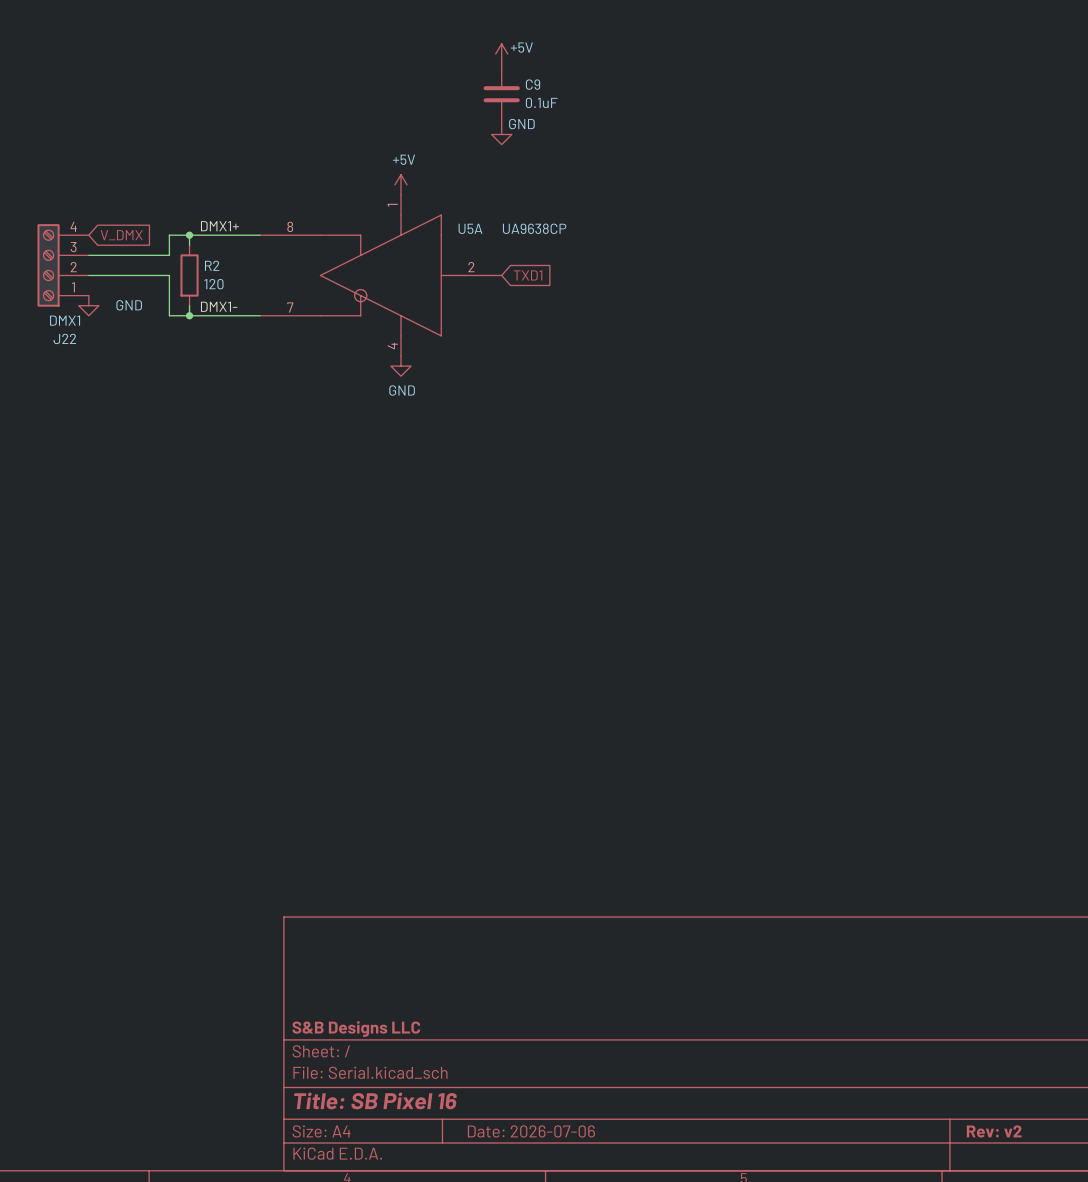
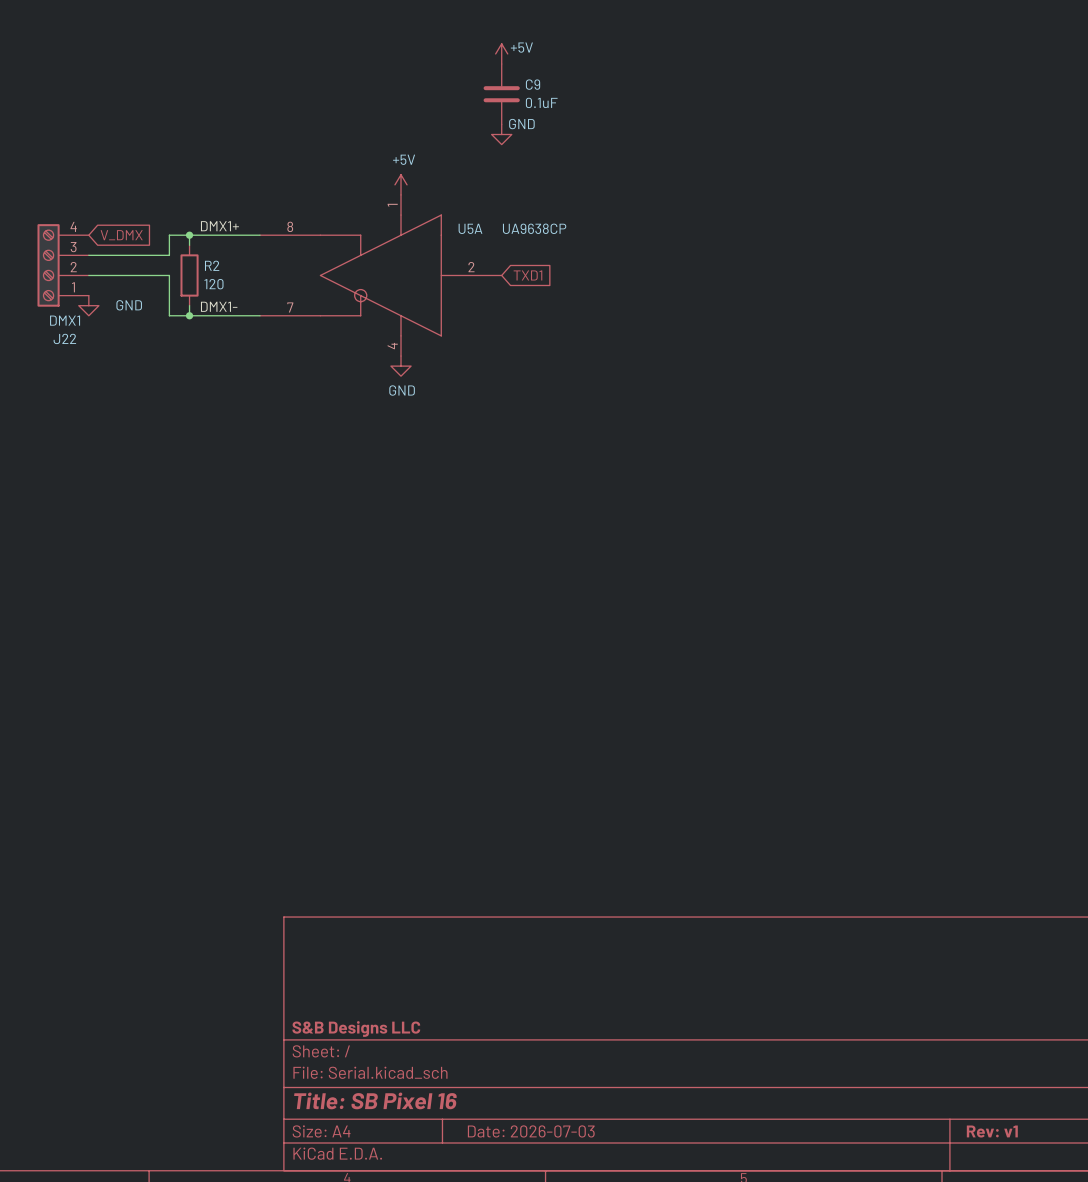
title block: Date: 2026-07-06 (531, 1131) -> Date: 2026-07-03 (531, 1131)
title block: Rev: v2 (994, 1131) -> Rev: v1 (992, 1131)

